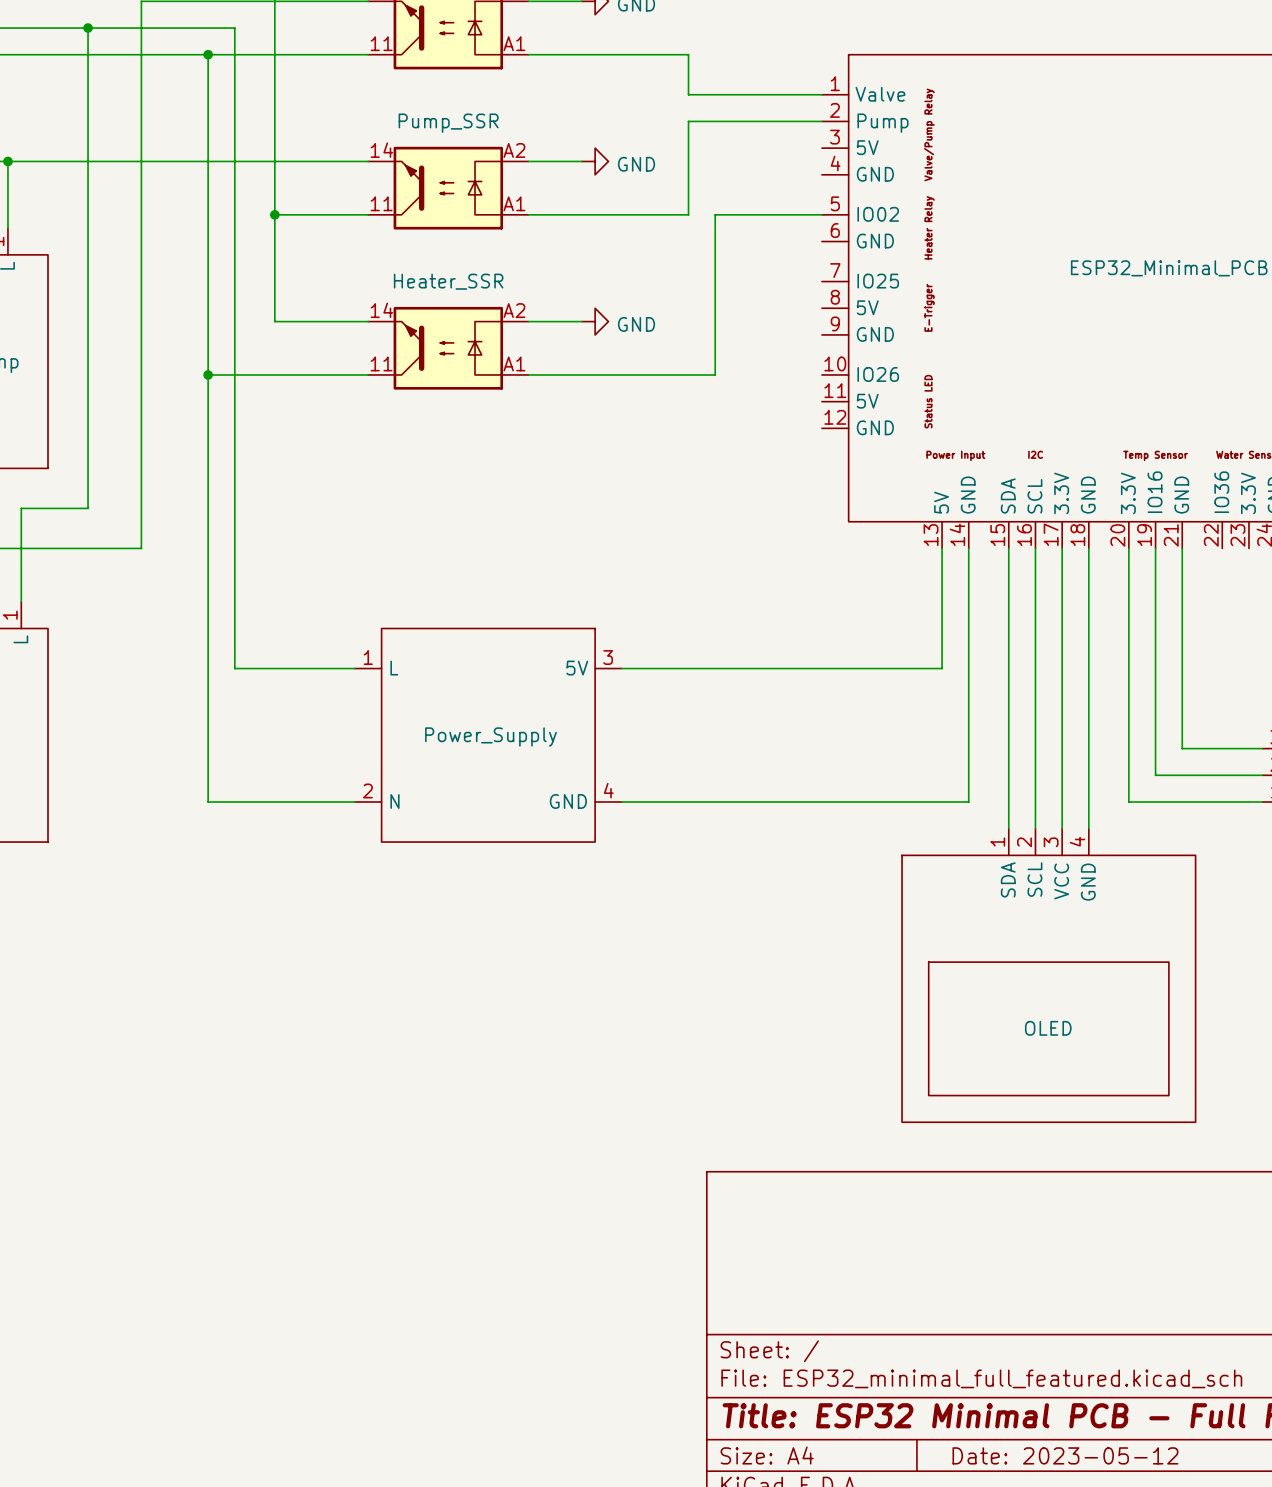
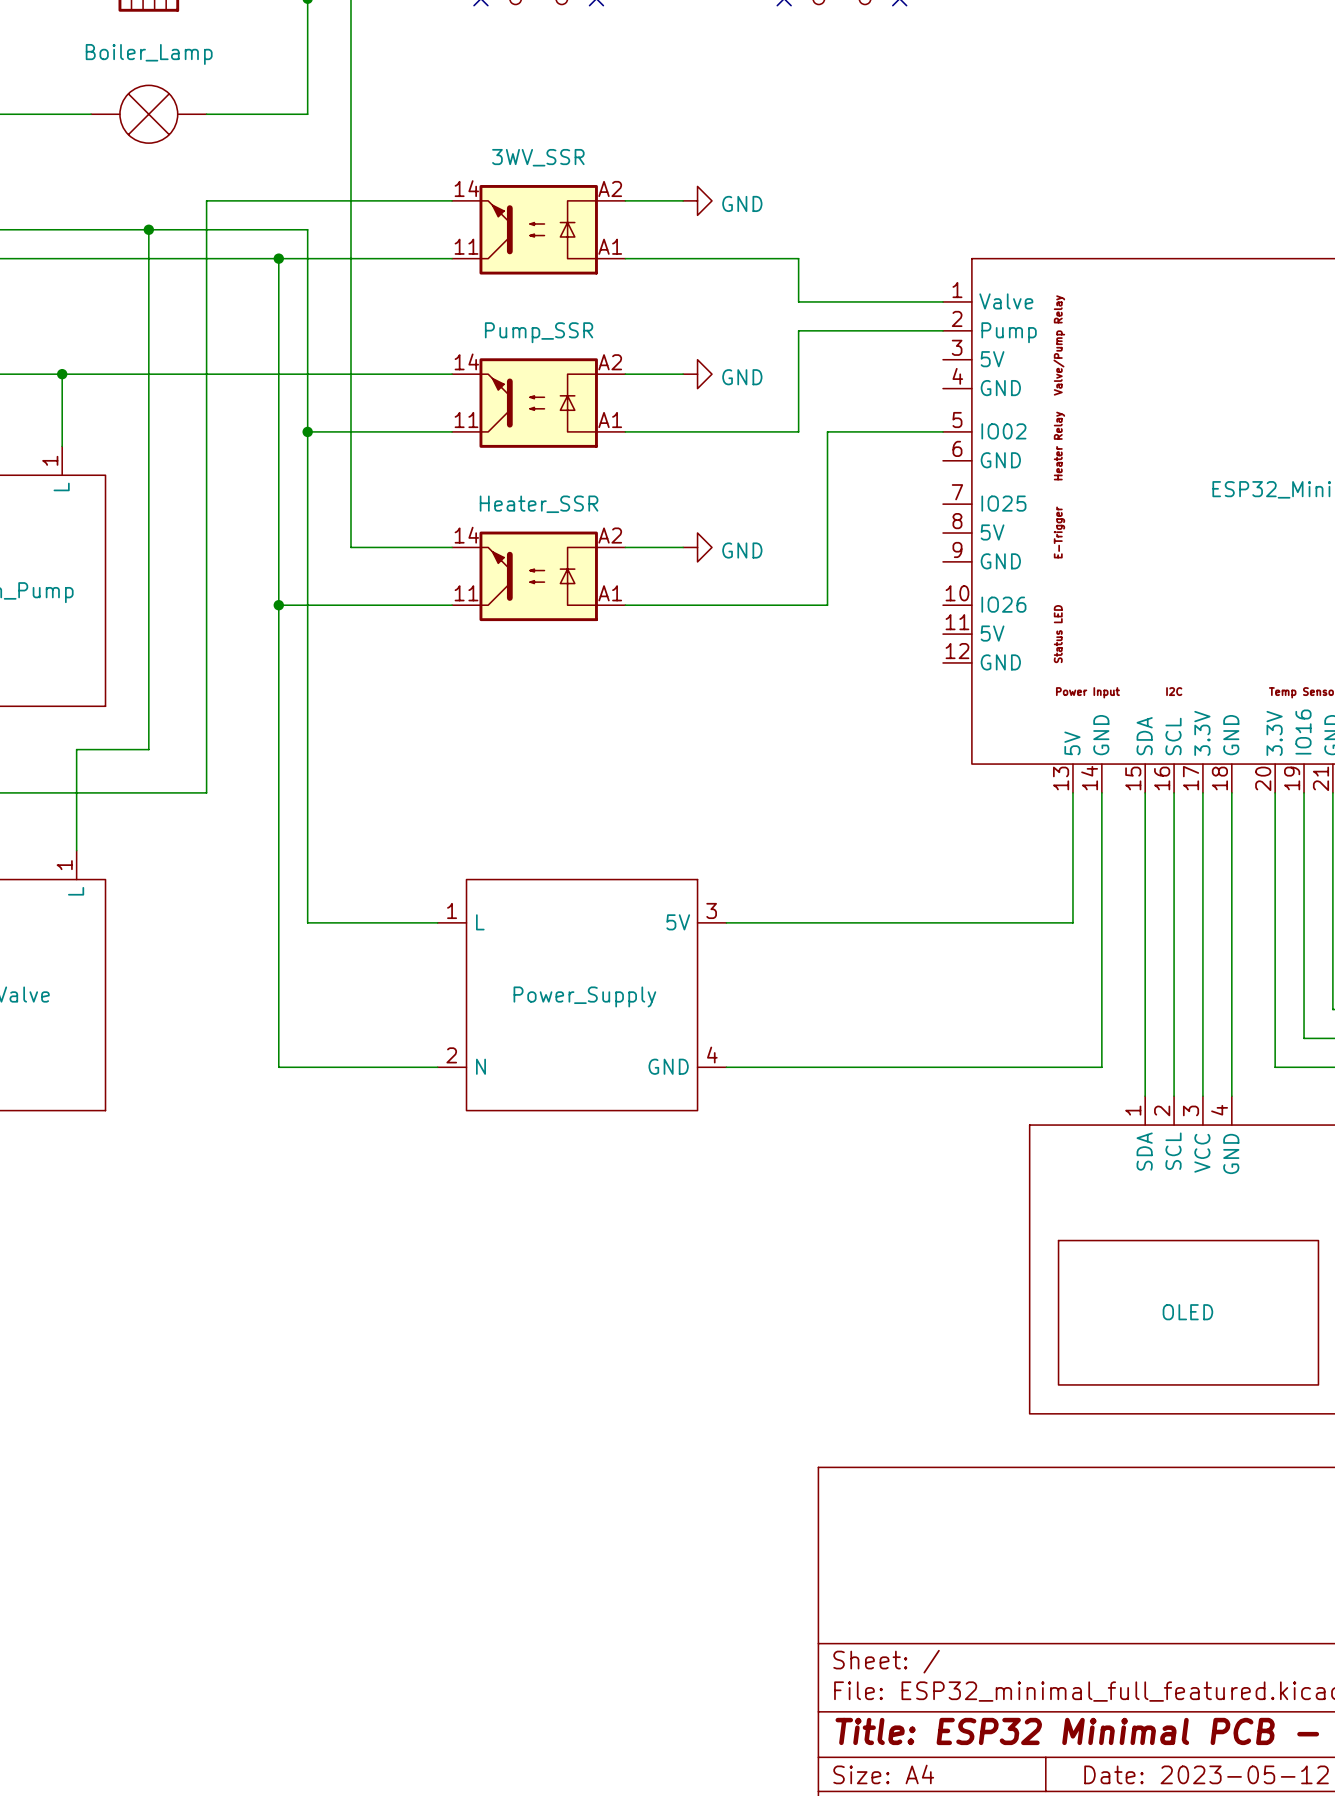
wire: none -> (307, 431) (350, 431)
junction position: (274, 214) -> (307, 431)

